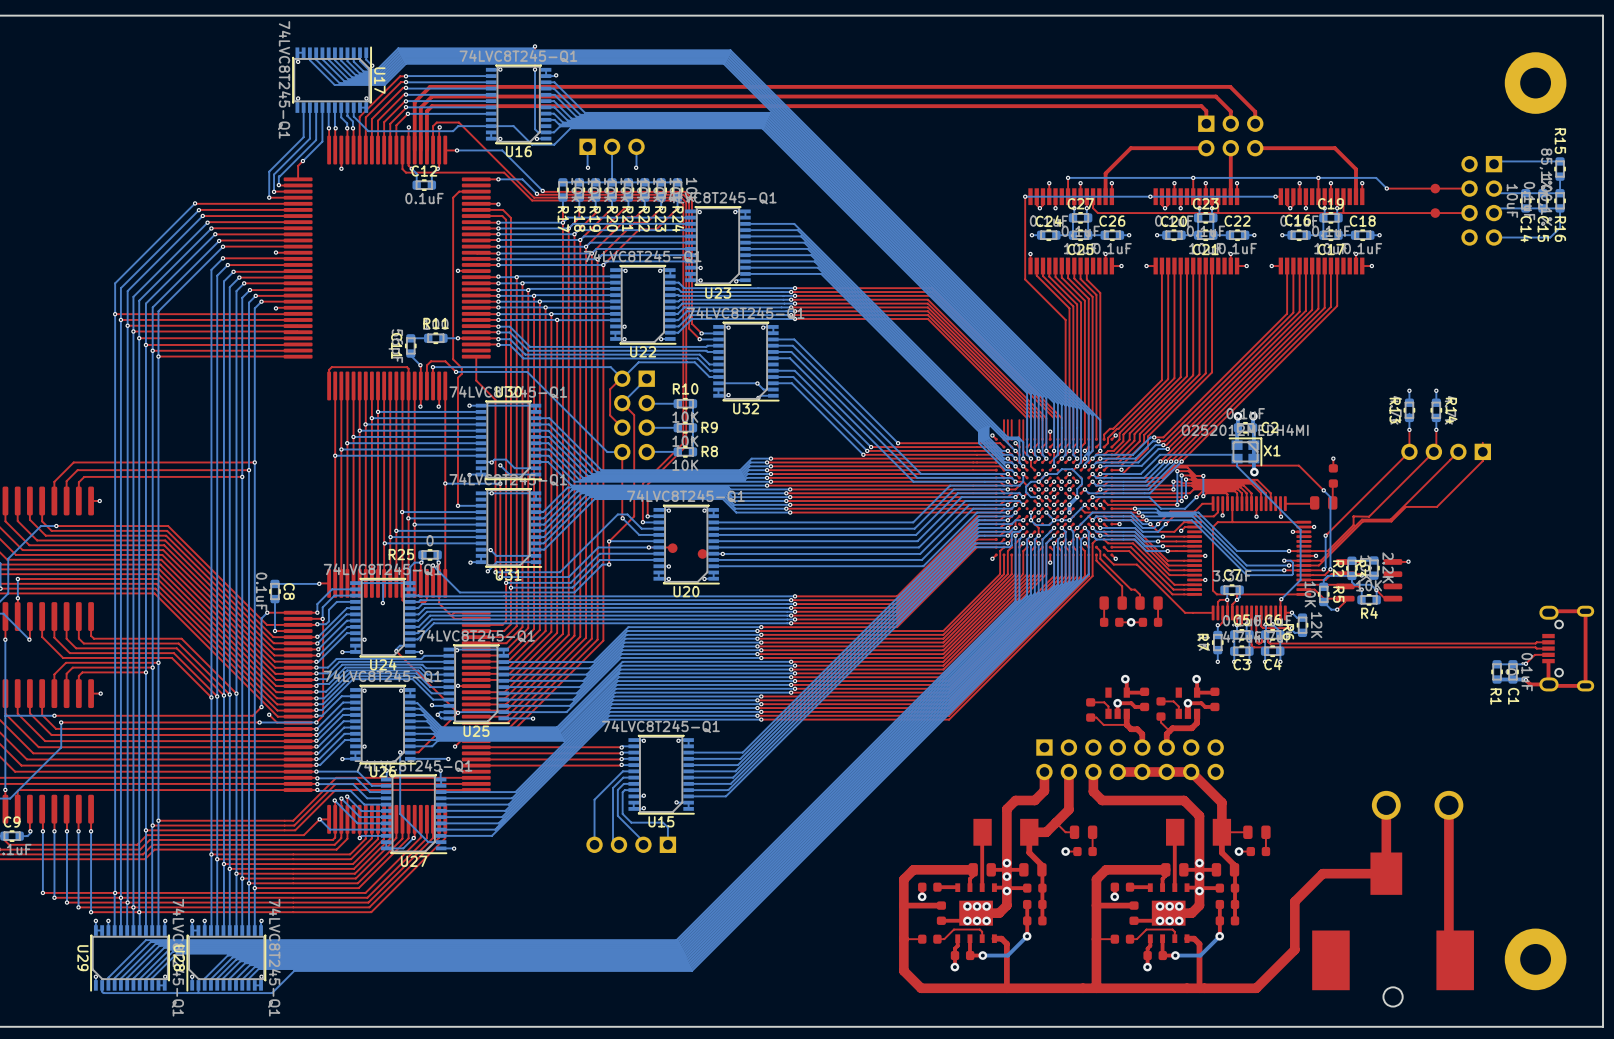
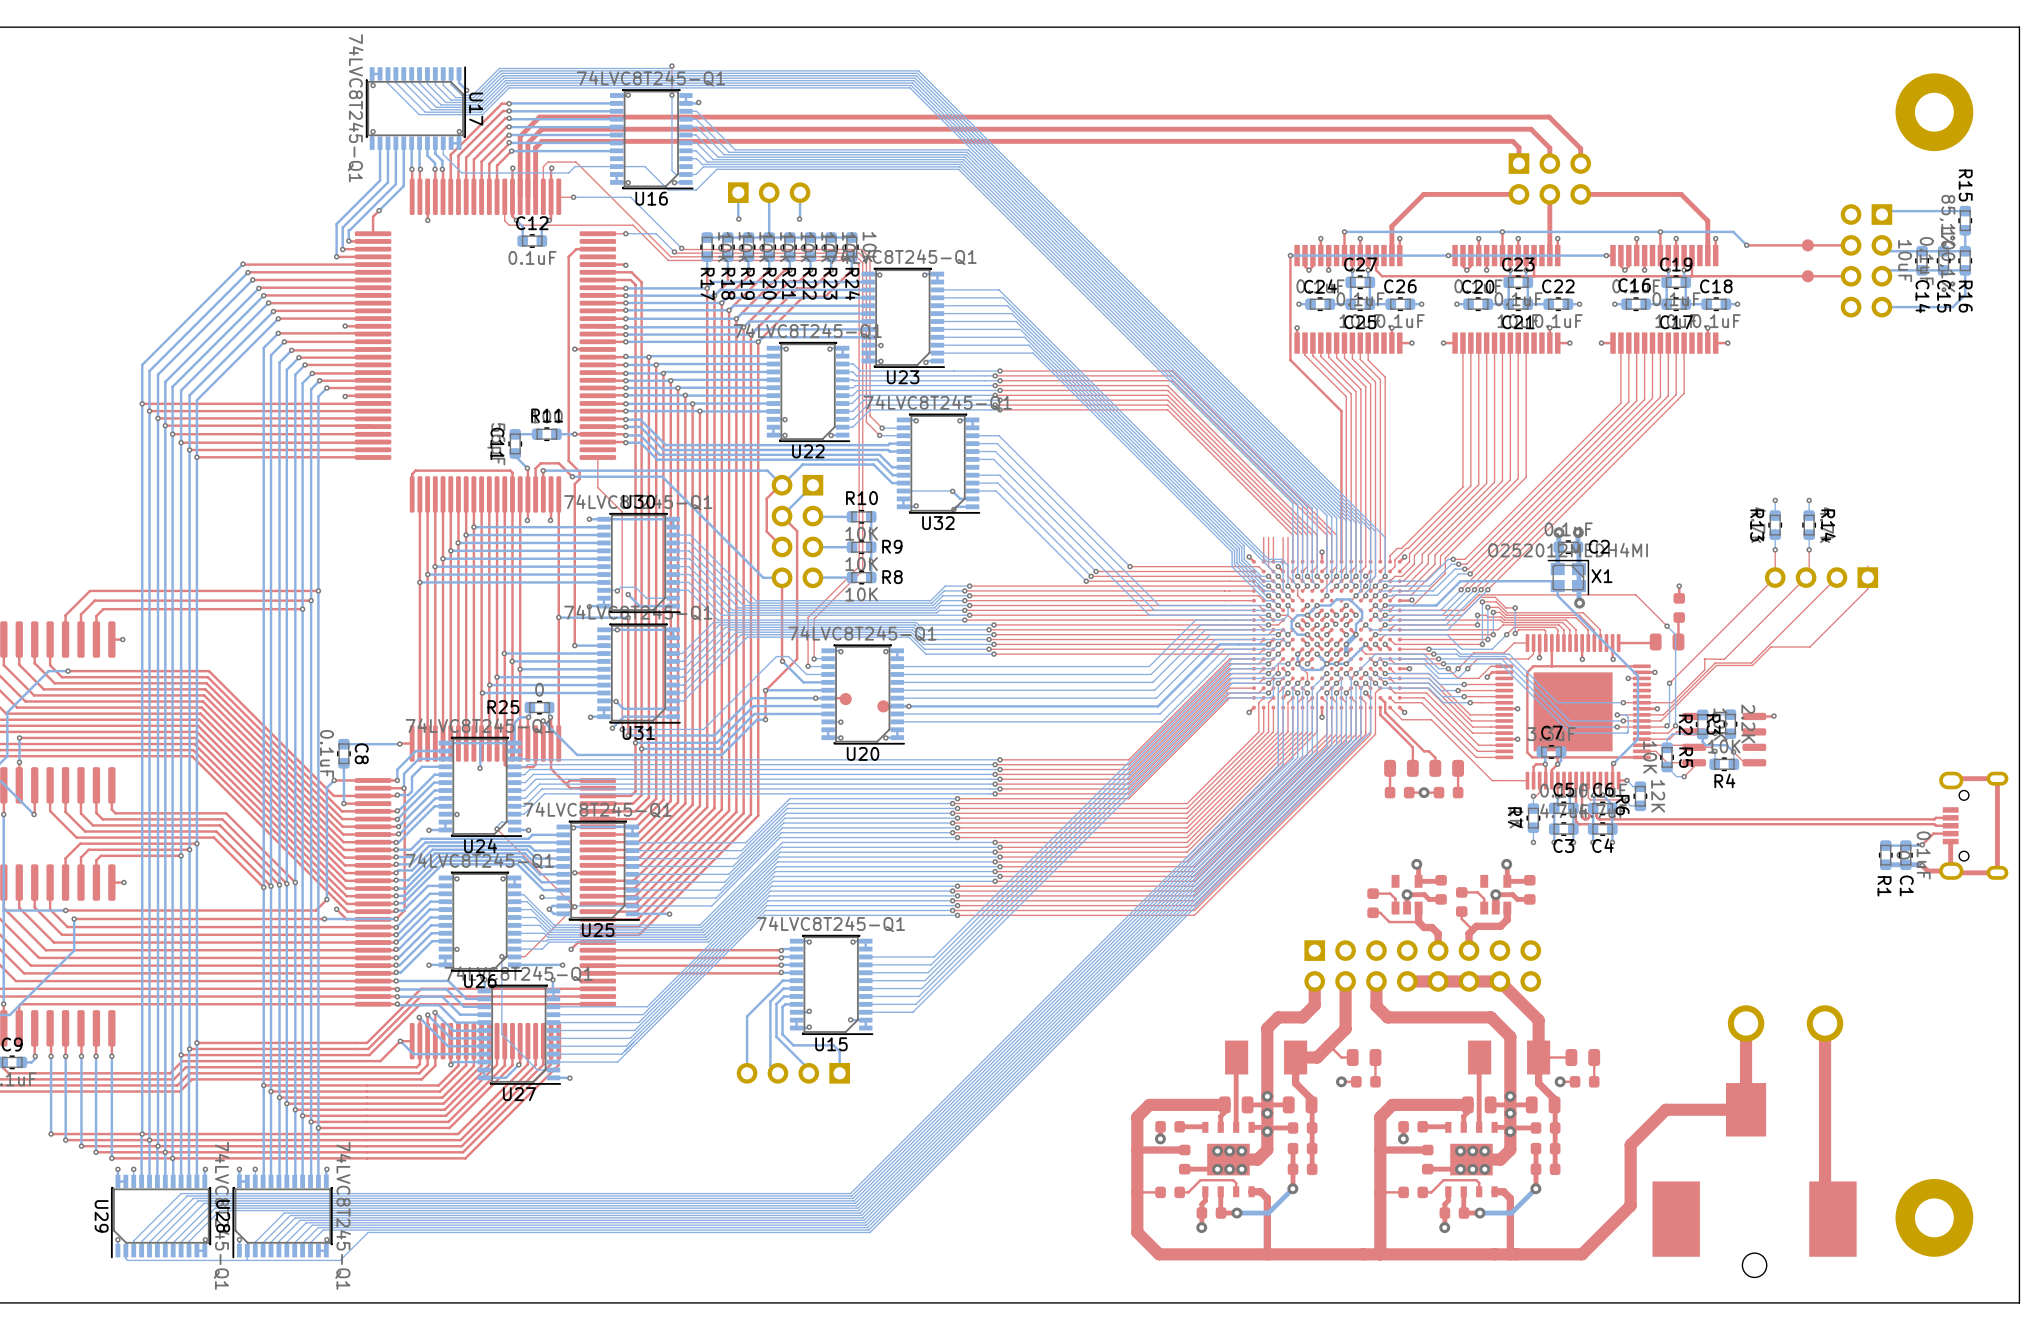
part footprint: [1187, 496, 1312, 621] -> [1495, 634, 1651, 790]

